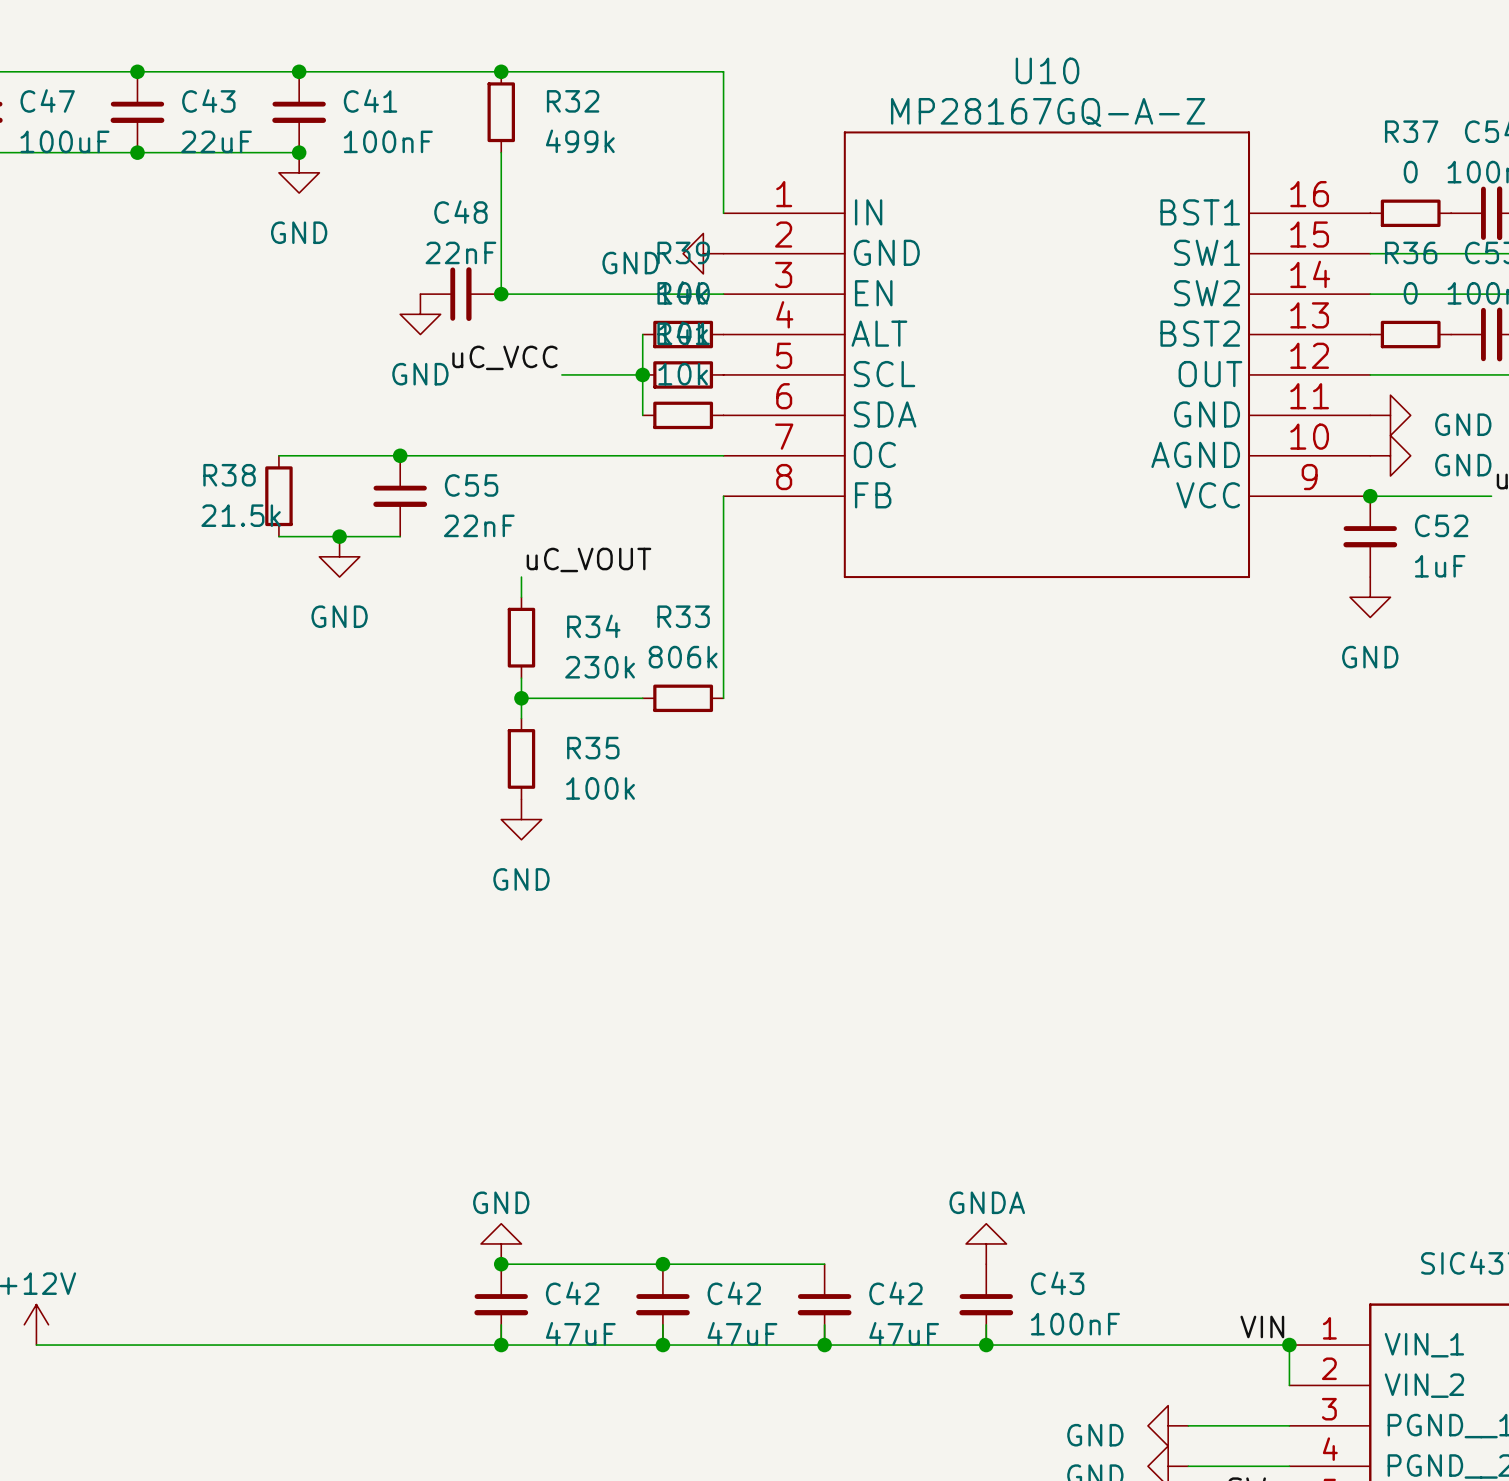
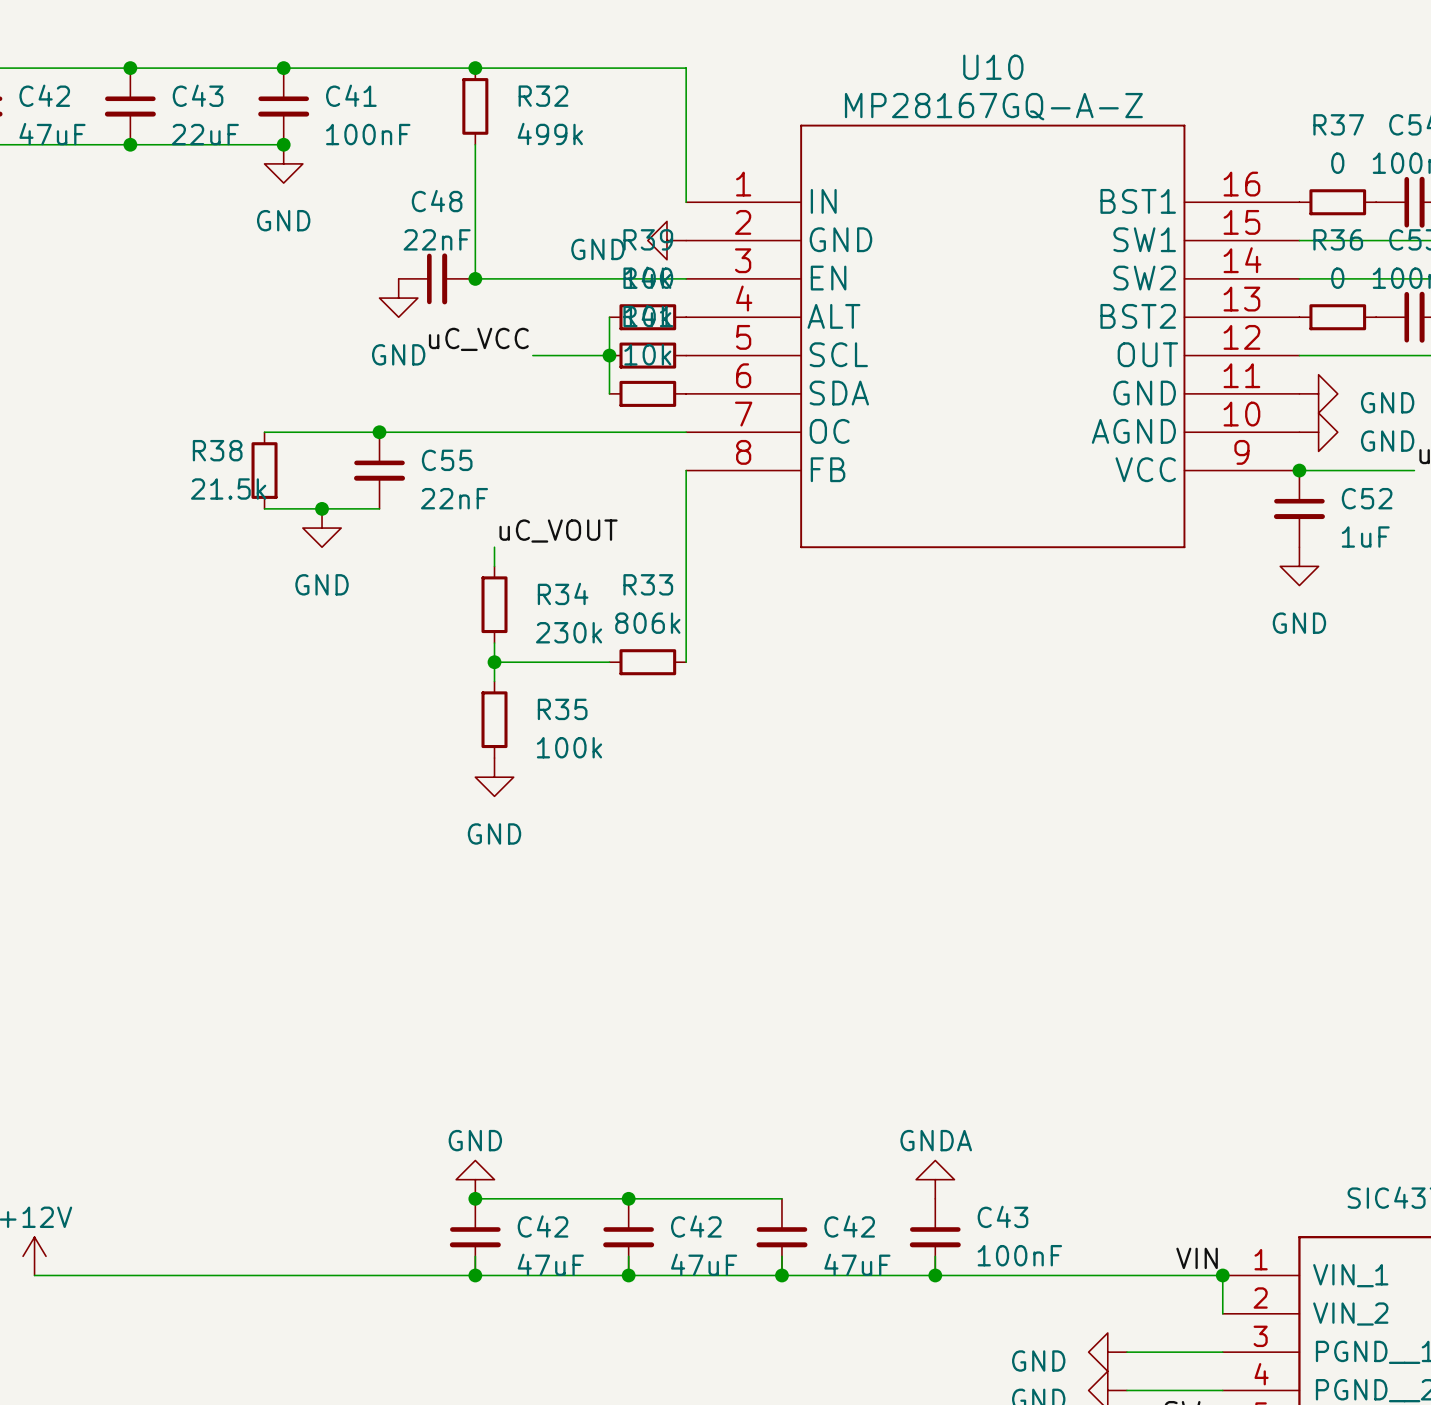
C47 name: C47 (47, 100) -> C42 (44, 95)
C47 value: 100uF (64, 141) -> 47uF (52, 134)

